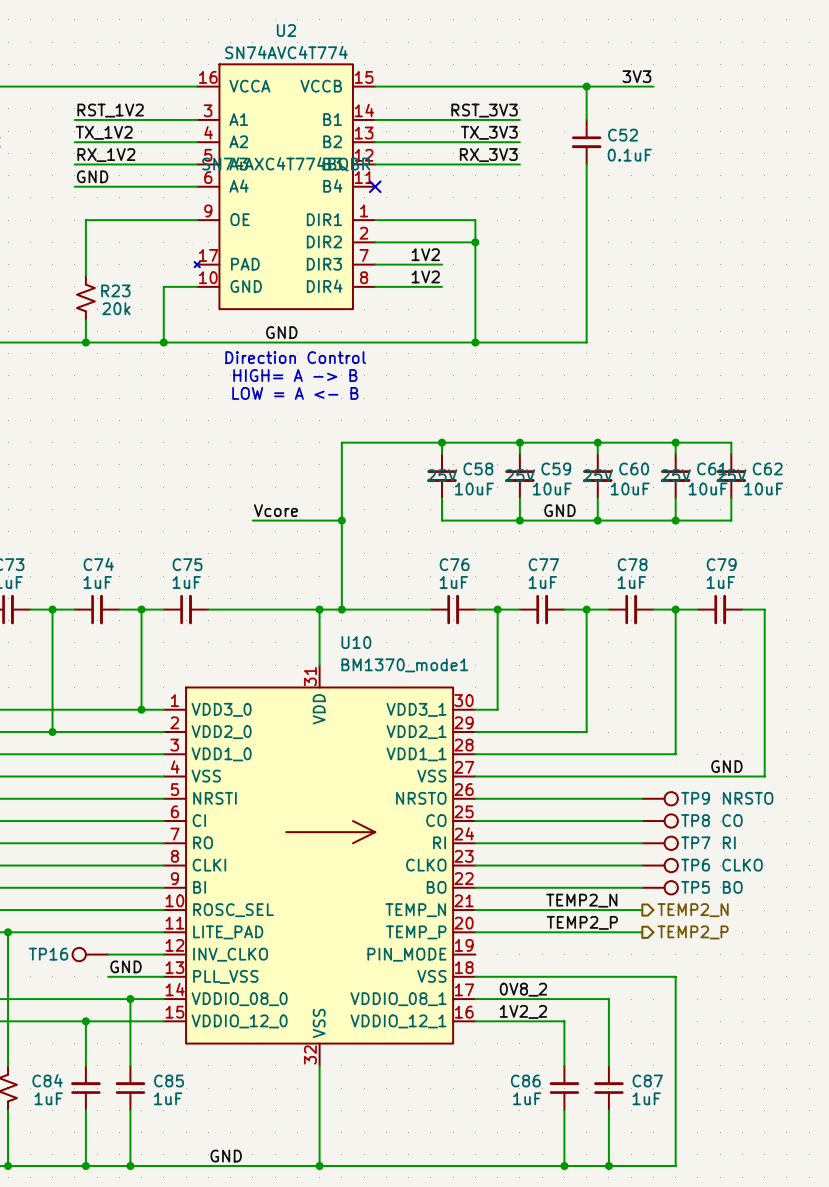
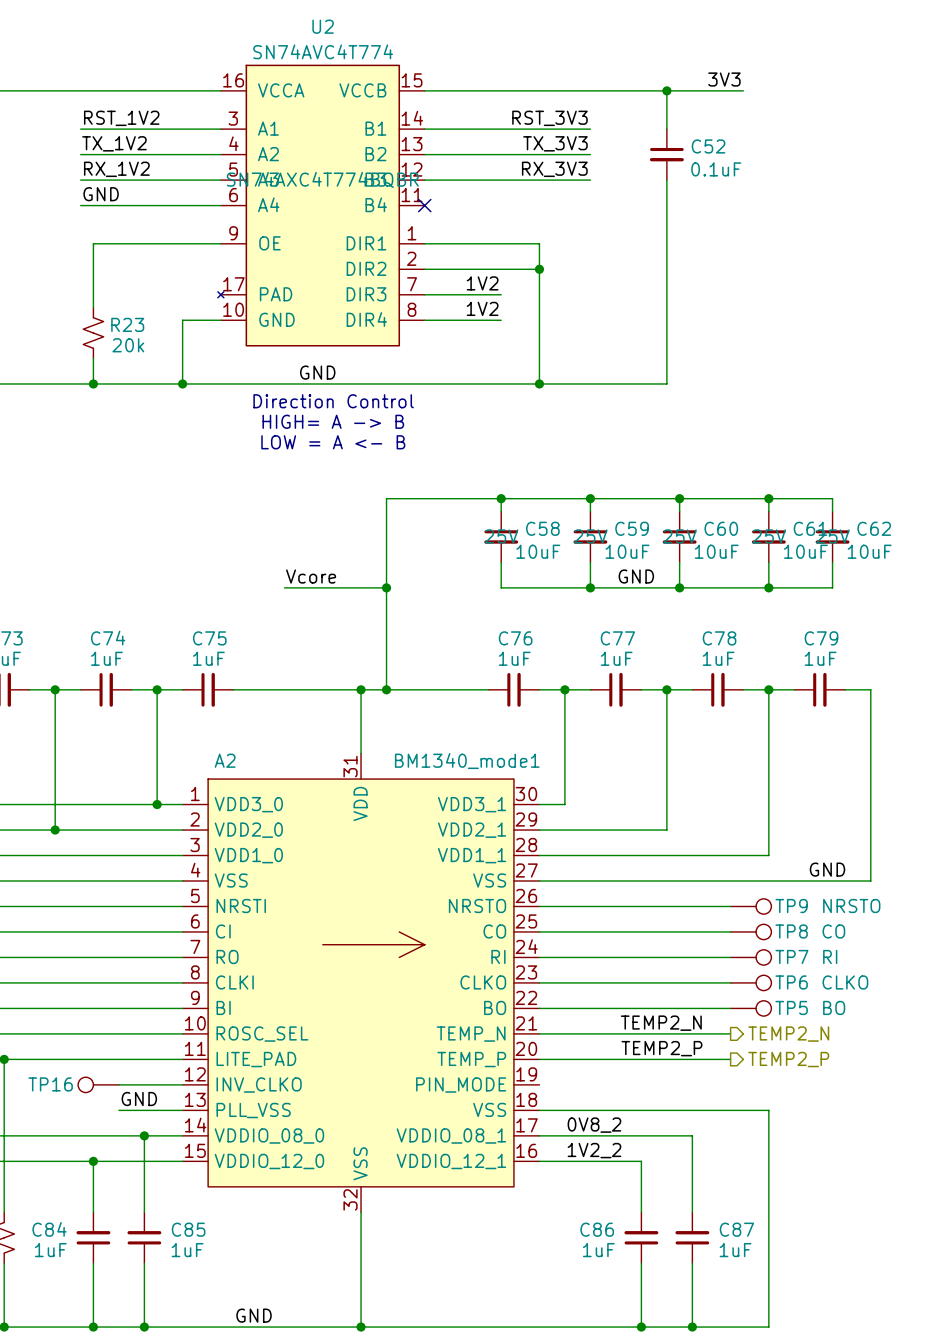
U10 name: U10 (356, 642) -> A2 (225, 760)
U10 value: BM1370_mode1 (404, 665) -> BM1340_mode1 (467, 761)

